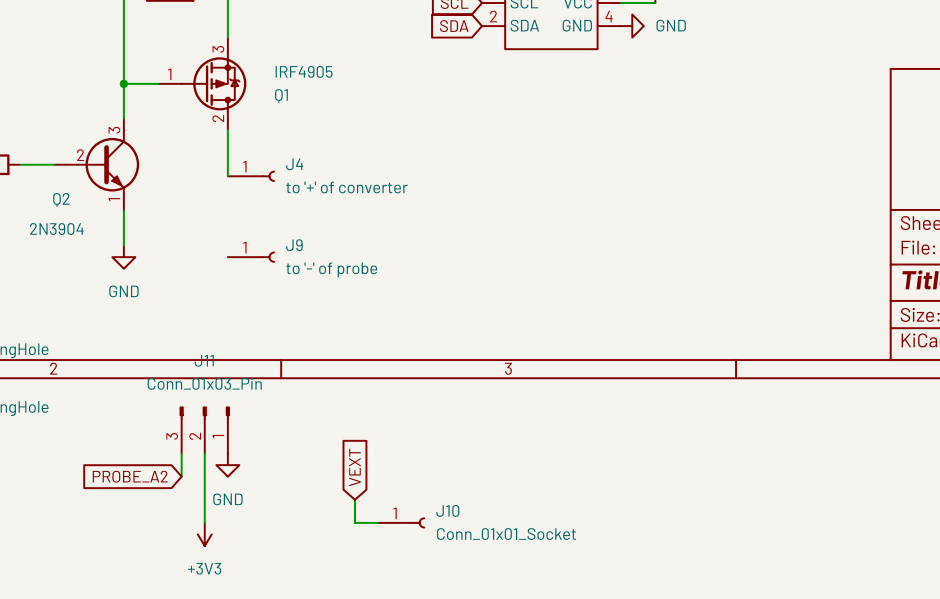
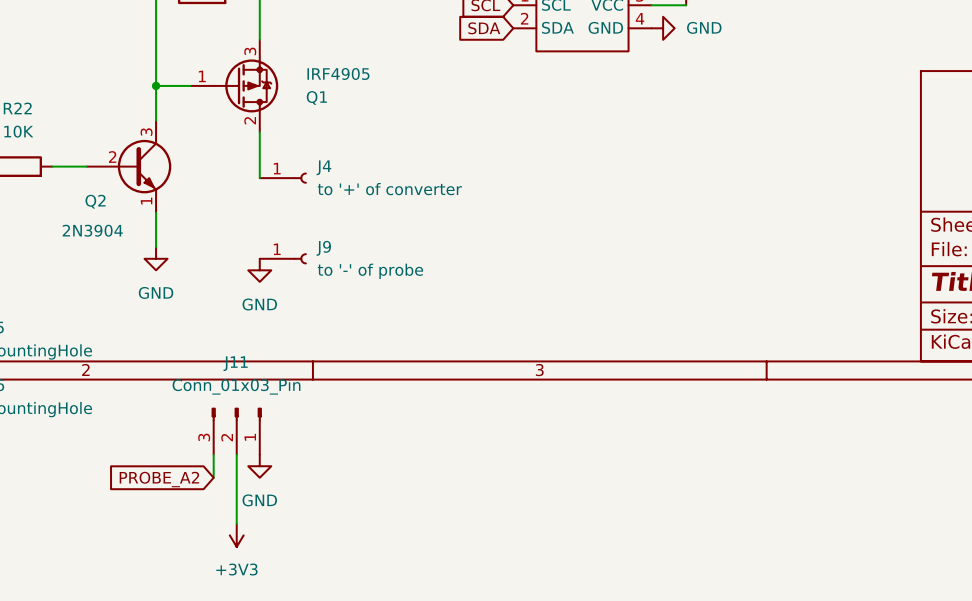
power symbol: none -> GND (259, 270)
global label: VEXT (354, 467) -> none
wire: (354, 499) (354, 522) (378, 522) -> none
J10: Conn_01x01_Socket (401, 522) -> none

